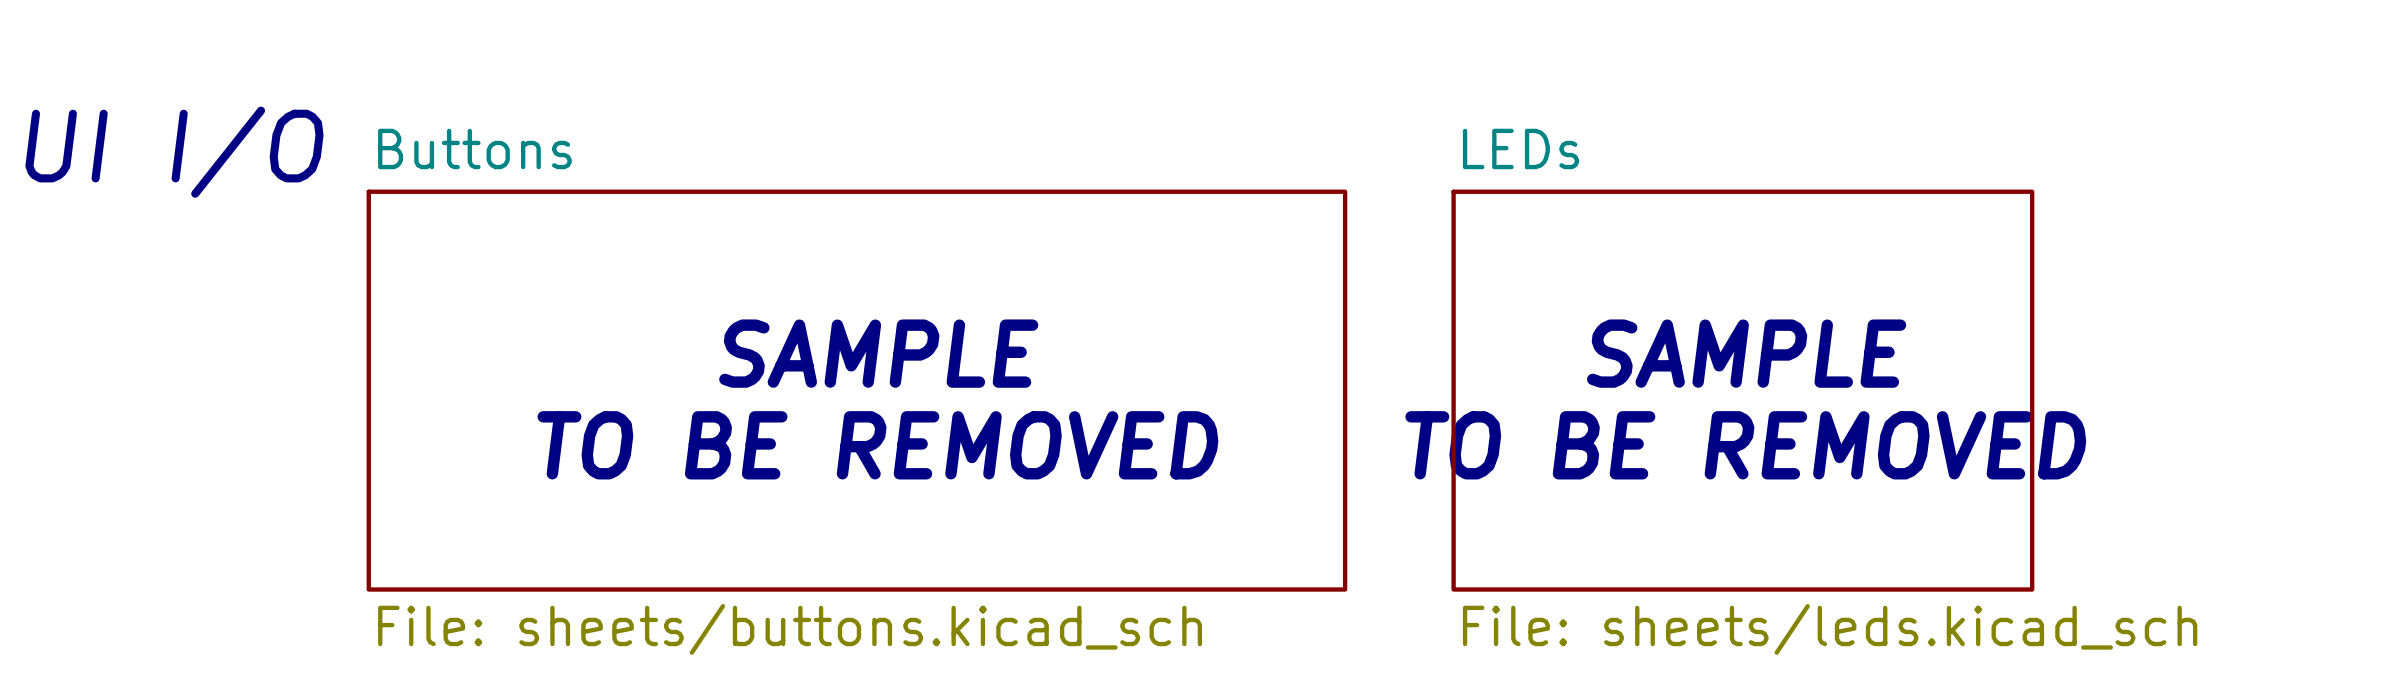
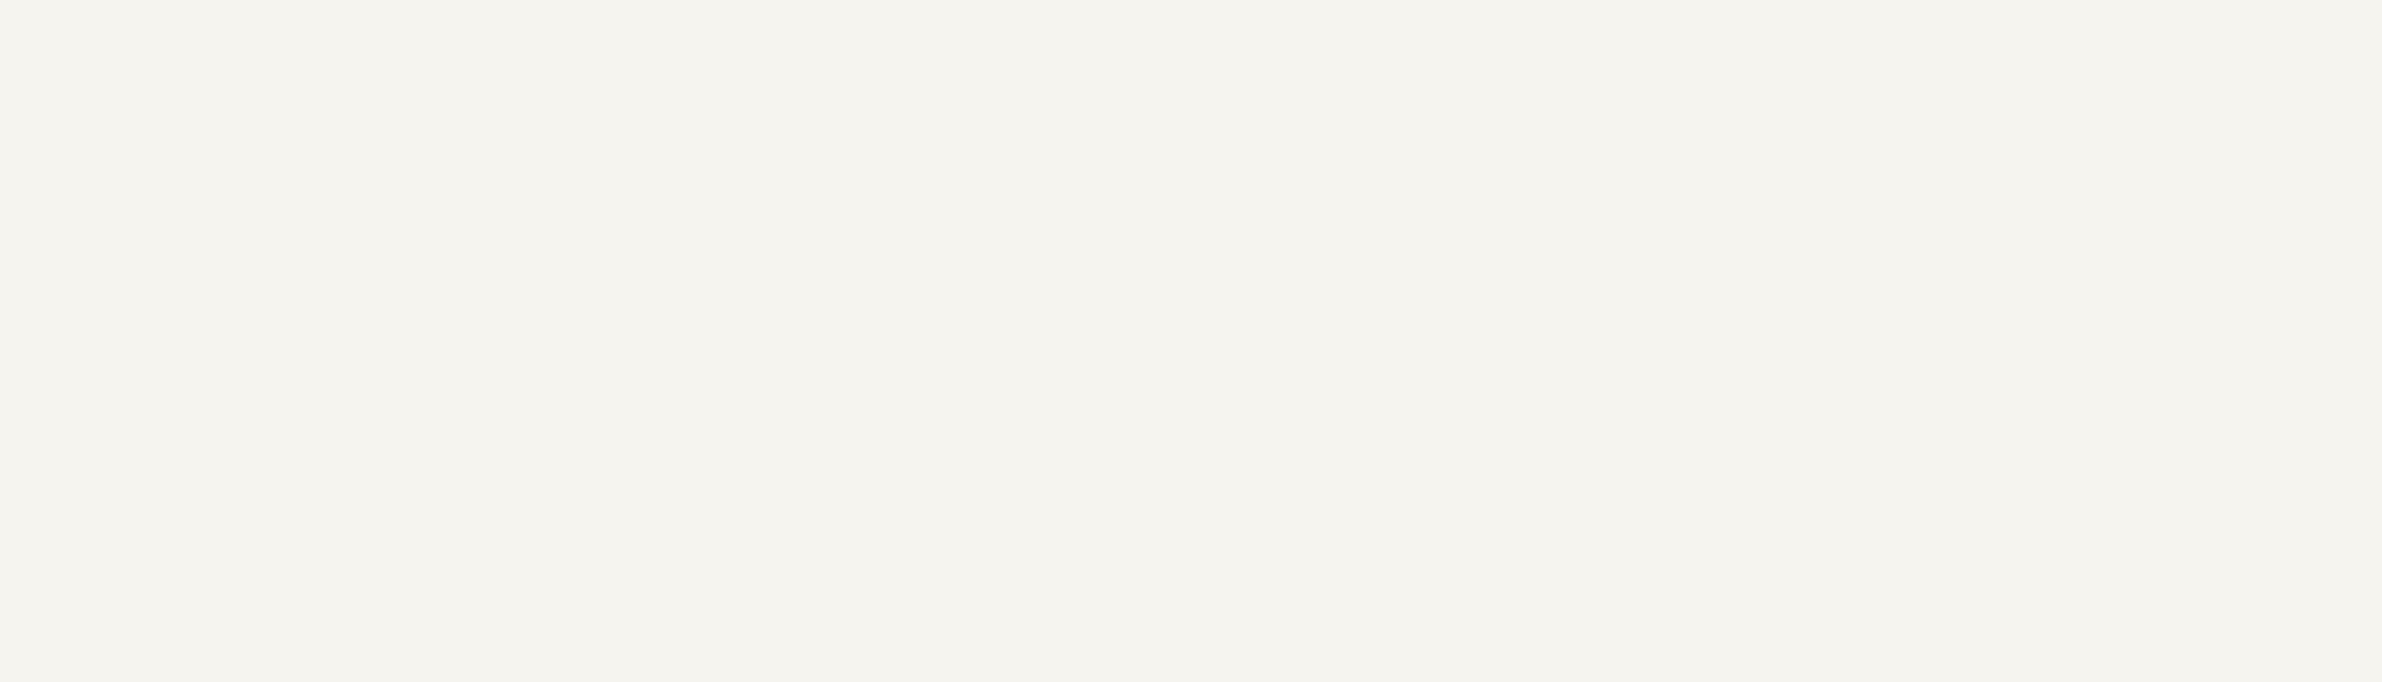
text: UI I/O (174, 152) -> none
text: SAMPLE (878, 353) -> none
text: SAMPLE (1746, 353) -> none
sheet Buttons: File: sheets/buttons.kicad_sch (856, 390) -> none
sheet LEDs: File: sheets/leds.kicad_sch (1742, 390) -> none
text: TO BE REMOVED (877, 445) -> none
text: TO BE REMOVED (1745, 445) -> none

